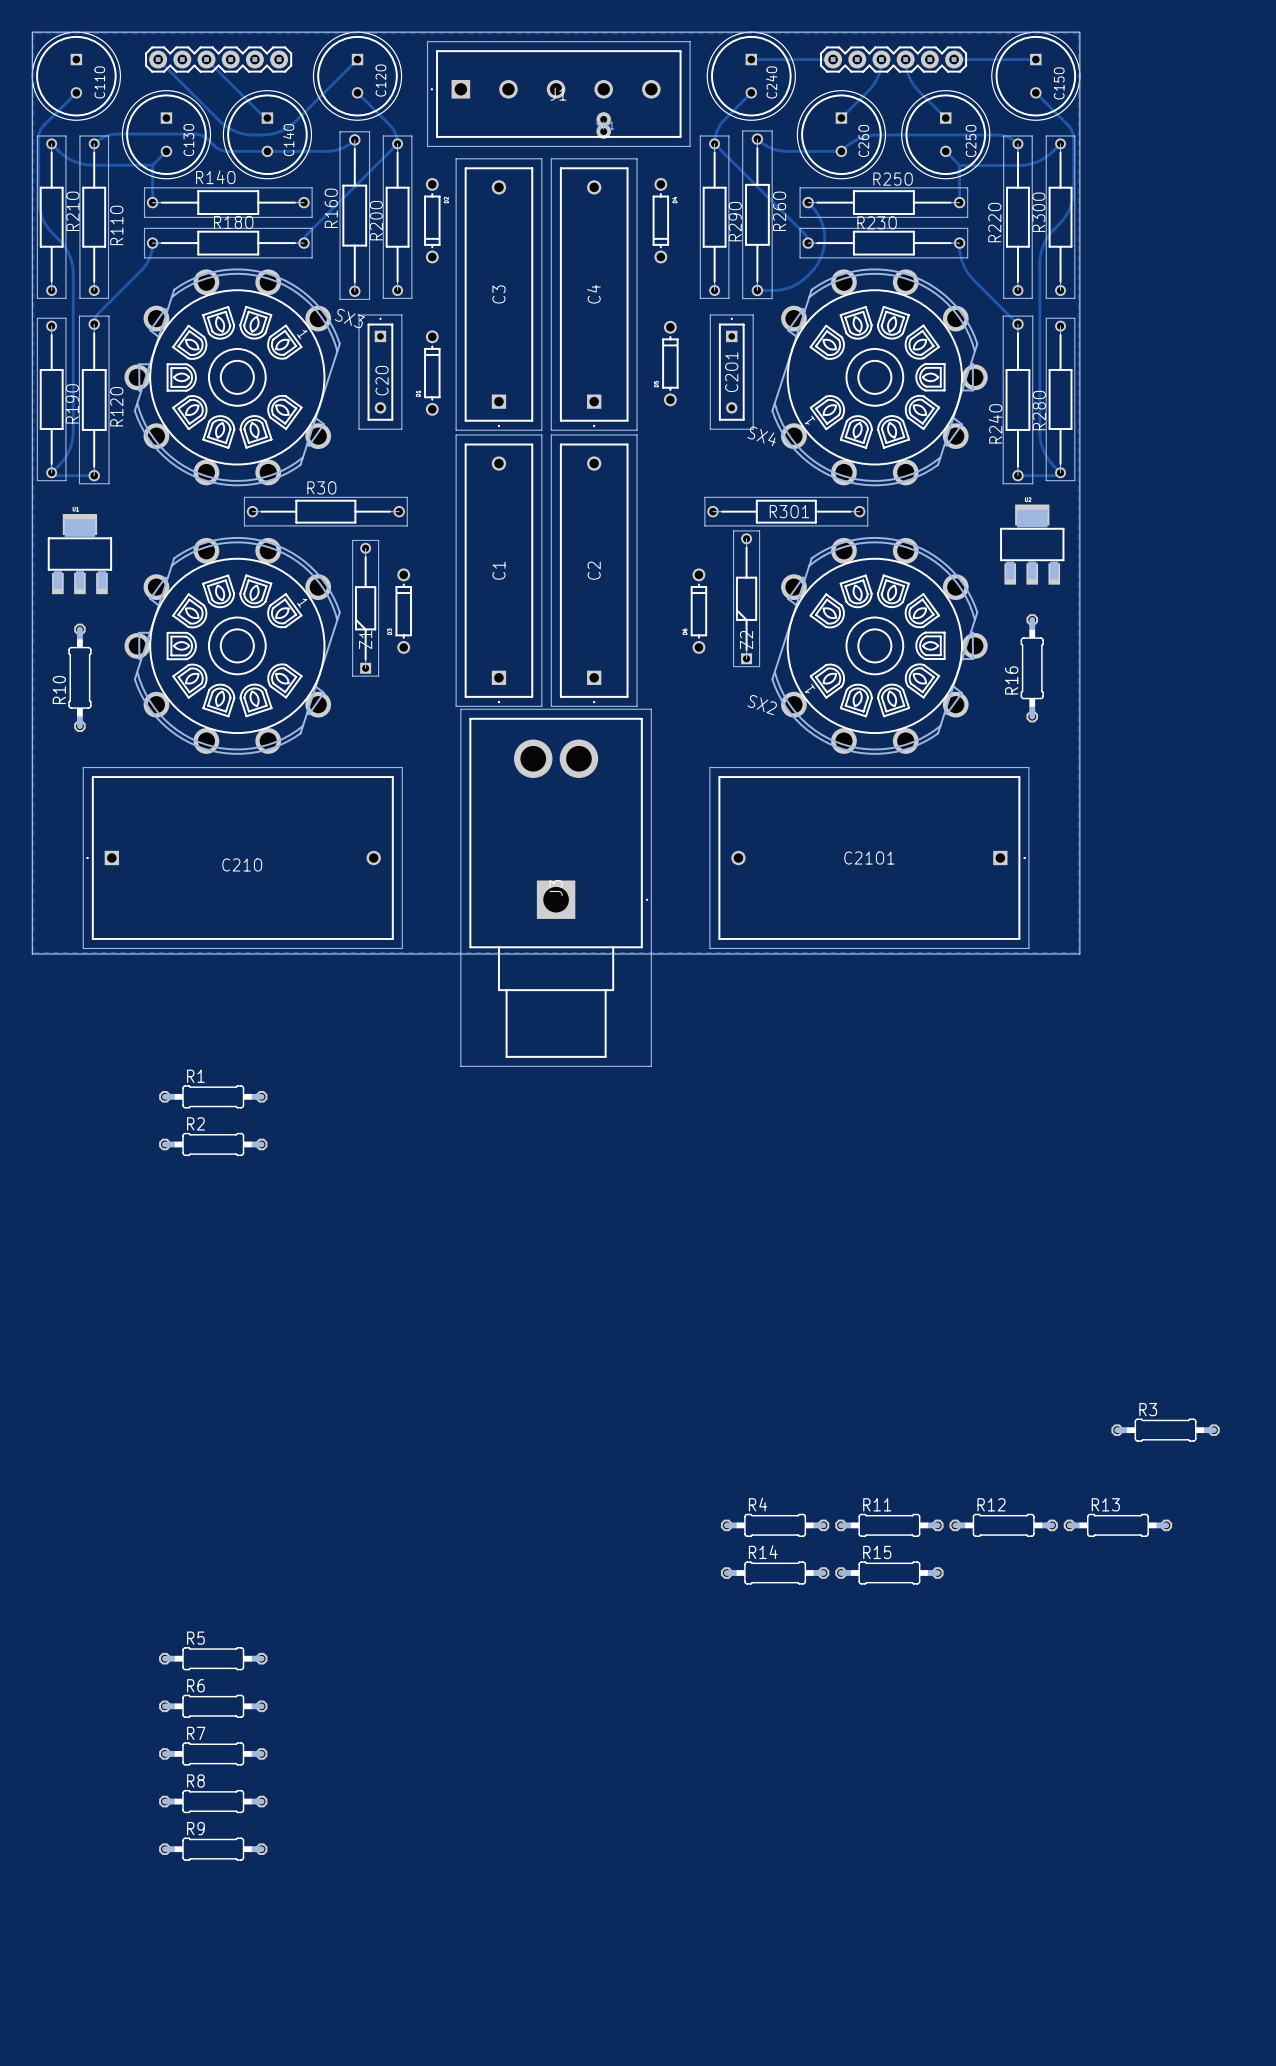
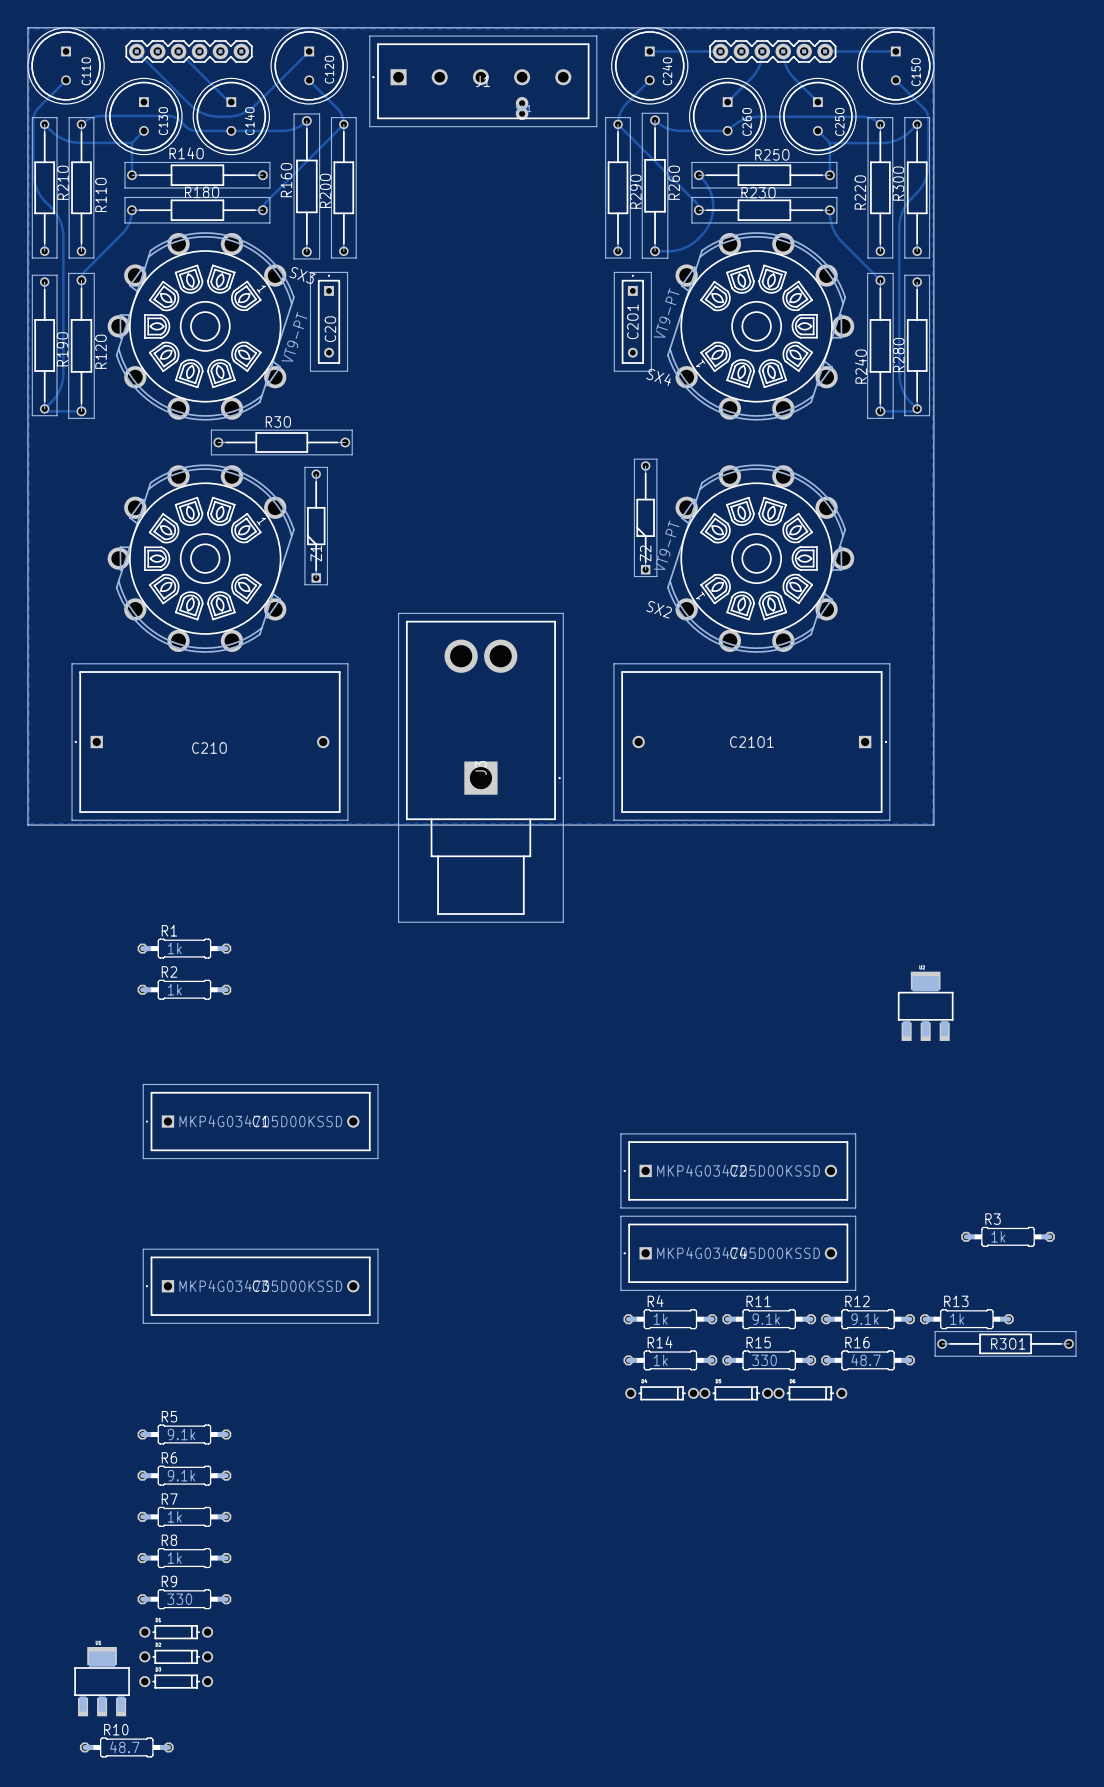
part rotation: 0° (432, 220) -> 90° counterclockwise (176, 1656)
part position: (432, 220) -> (176, 1656)
part rotation: 0° (660, 220) -> 90° counterclockwise (662, 1393)
part position: (660, 220) -> (662, 1393)
C3 rotation: 0° (498, 294) -> 90° clockwise (260, 1286)
C3 position: (498, 294) -> (260, 1286)
C4 rotation: 0° (594, 294) -> 90° clockwise (738, 1253)
C4 position: (594, 294) -> (738, 1253)
SX4 value: none -> VT9-PT (666, 312)
part rotation: 0° (670, 363) -> 90° clockwise (736, 1393)
part position: (670, 363) -> (736, 1393)
part rotation: 0° (432, 373) -> 90° clockwise (176, 1632)
part position: (432, 373) -> (176, 1632)
SX3 value: none -> VT9-PT (294, 336)
R3O1 position: (786, 511) -> (1005, 1343)
part position: (1032, 544) -> (925, 1006)
part position: (79, 554) -> (102, 1681)
C1 rotation: 0° (498, 570) -> 90° clockwise (260, 1121)
C1 position: (498, 570) -> (260, 1121)
C2 rotation: 0° (594, 570) -> 90° clockwise (738, 1170)
C2 position: (594, 570) -> (738, 1170)
part rotation: 0° (403, 611) -> 90° clockwise (176, 1681)
part position: (403, 611) -> (176, 1681)
part rotation: 0° (698, 611) -> 90° clockwise (810, 1393)
part position: (698, 611) -> (810, 1393)
SX2 value: none -> VT9-PT (666, 545)
R16 rotation: 0° (1032, 668) -> 90° clockwise (868, 1360)
R16 position: (1032, 668) -> (868, 1360)
R10 rotation: 0° (79, 677) -> 90° clockwise (126, 1747)
R10 position: (79, 677) -> (126, 1747)
R1 value: none -> 1k (174, 948)
R2 value: none -> 1k (174, 989)
C1 value: none -> MKP4G034705D00KSSD (260, 1121)
C2 value: none -> MKP4G034705D00KSSD (738, 1170)
R3 value: none -> 1k (998, 1236)
C4 value: none -> MKP4G034705D00KSSD (738, 1253)
C3 value: none -> MKP4G034705D00KSSD (260, 1286)
R4 value: none -> 1k (660, 1319)
R11 value: none -> 9.1k (766, 1319)
R12 value: none -> 9.1k (865, 1319)
R13 value: none -> 1k (957, 1319)
R14 value: none -> 1k (660, 1360)
R15 value: none -> 330 (764, 1360)
R16 value: none -> 48.7 (866, 1360)
R5 value: none -> 9.1k (181, 1434)
R6 value: none -> 9.1k (181, 1475)
R7 value: none -> 1k (174, 1516)
R8 value: none -> 1k (174, 1558)
R9 value: none -> 330 (179, 1599)
R10 value: none -> 48.7 (124, 1747)

